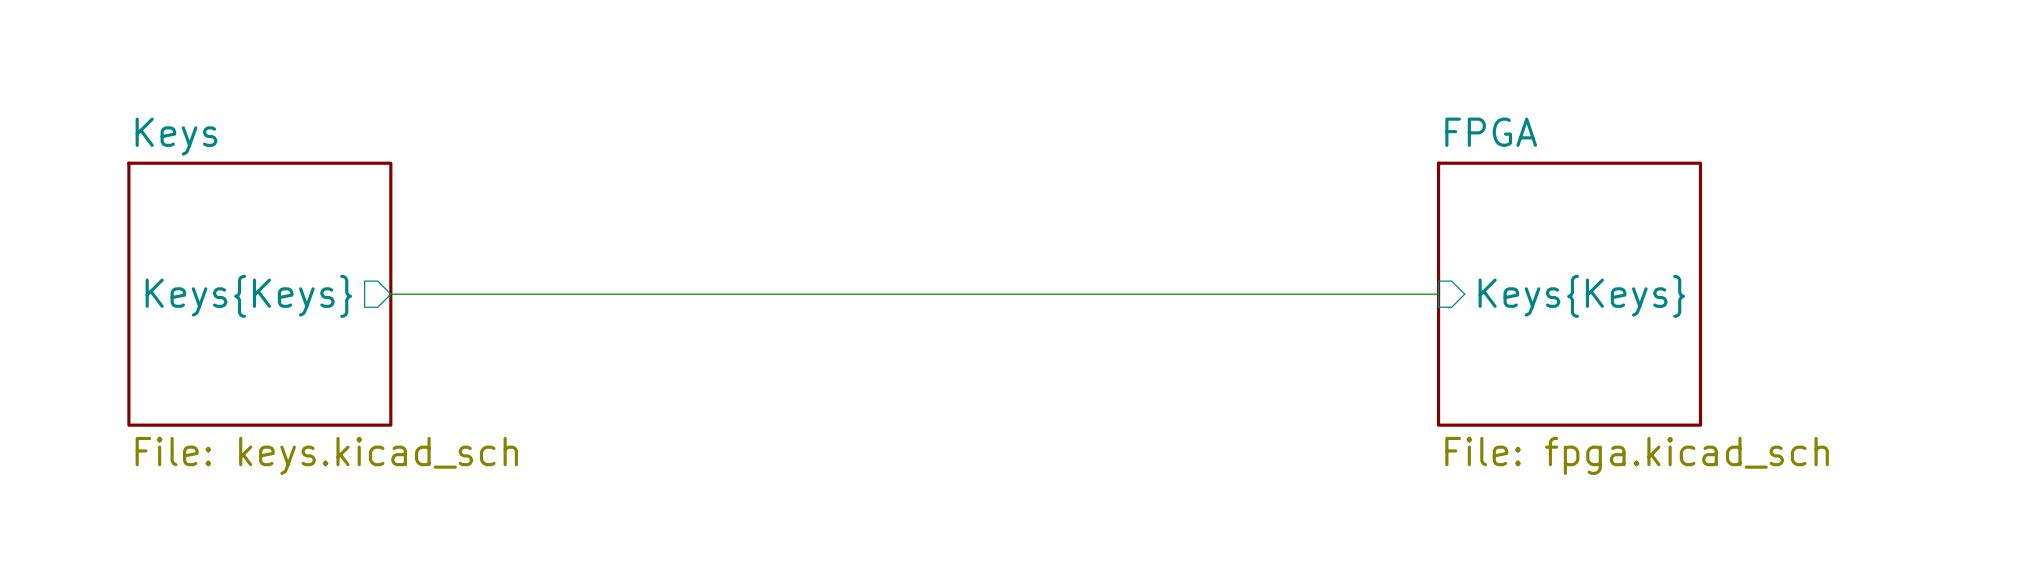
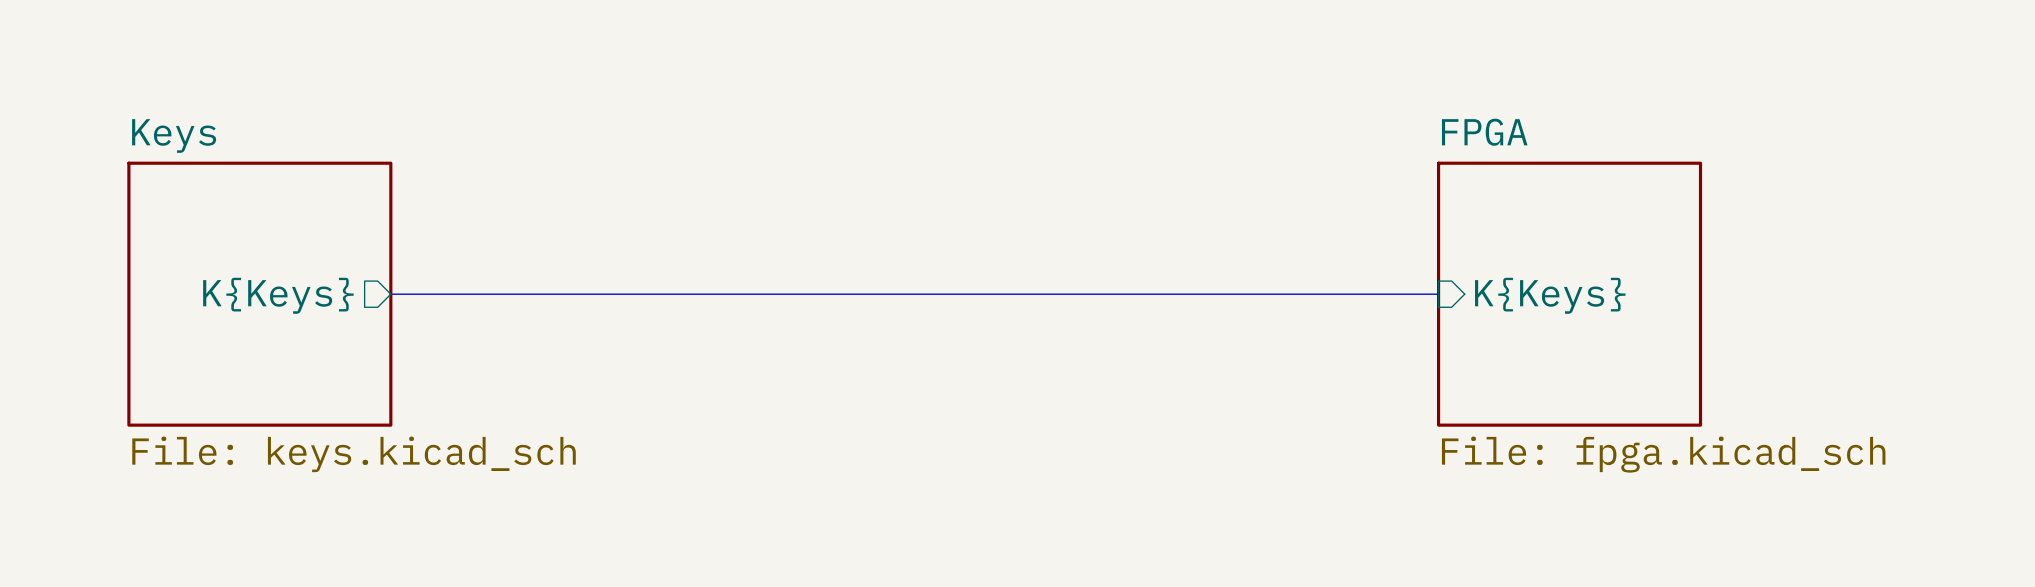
bus: none -> (390, 294) (1438, 294)
sheet pin: Keys{Keys} (248, 296) -> K{Keys} (278, 295)
sheet pin: Keys{Keys} (1581, 296) -> K{Keys} (1550, 295)

